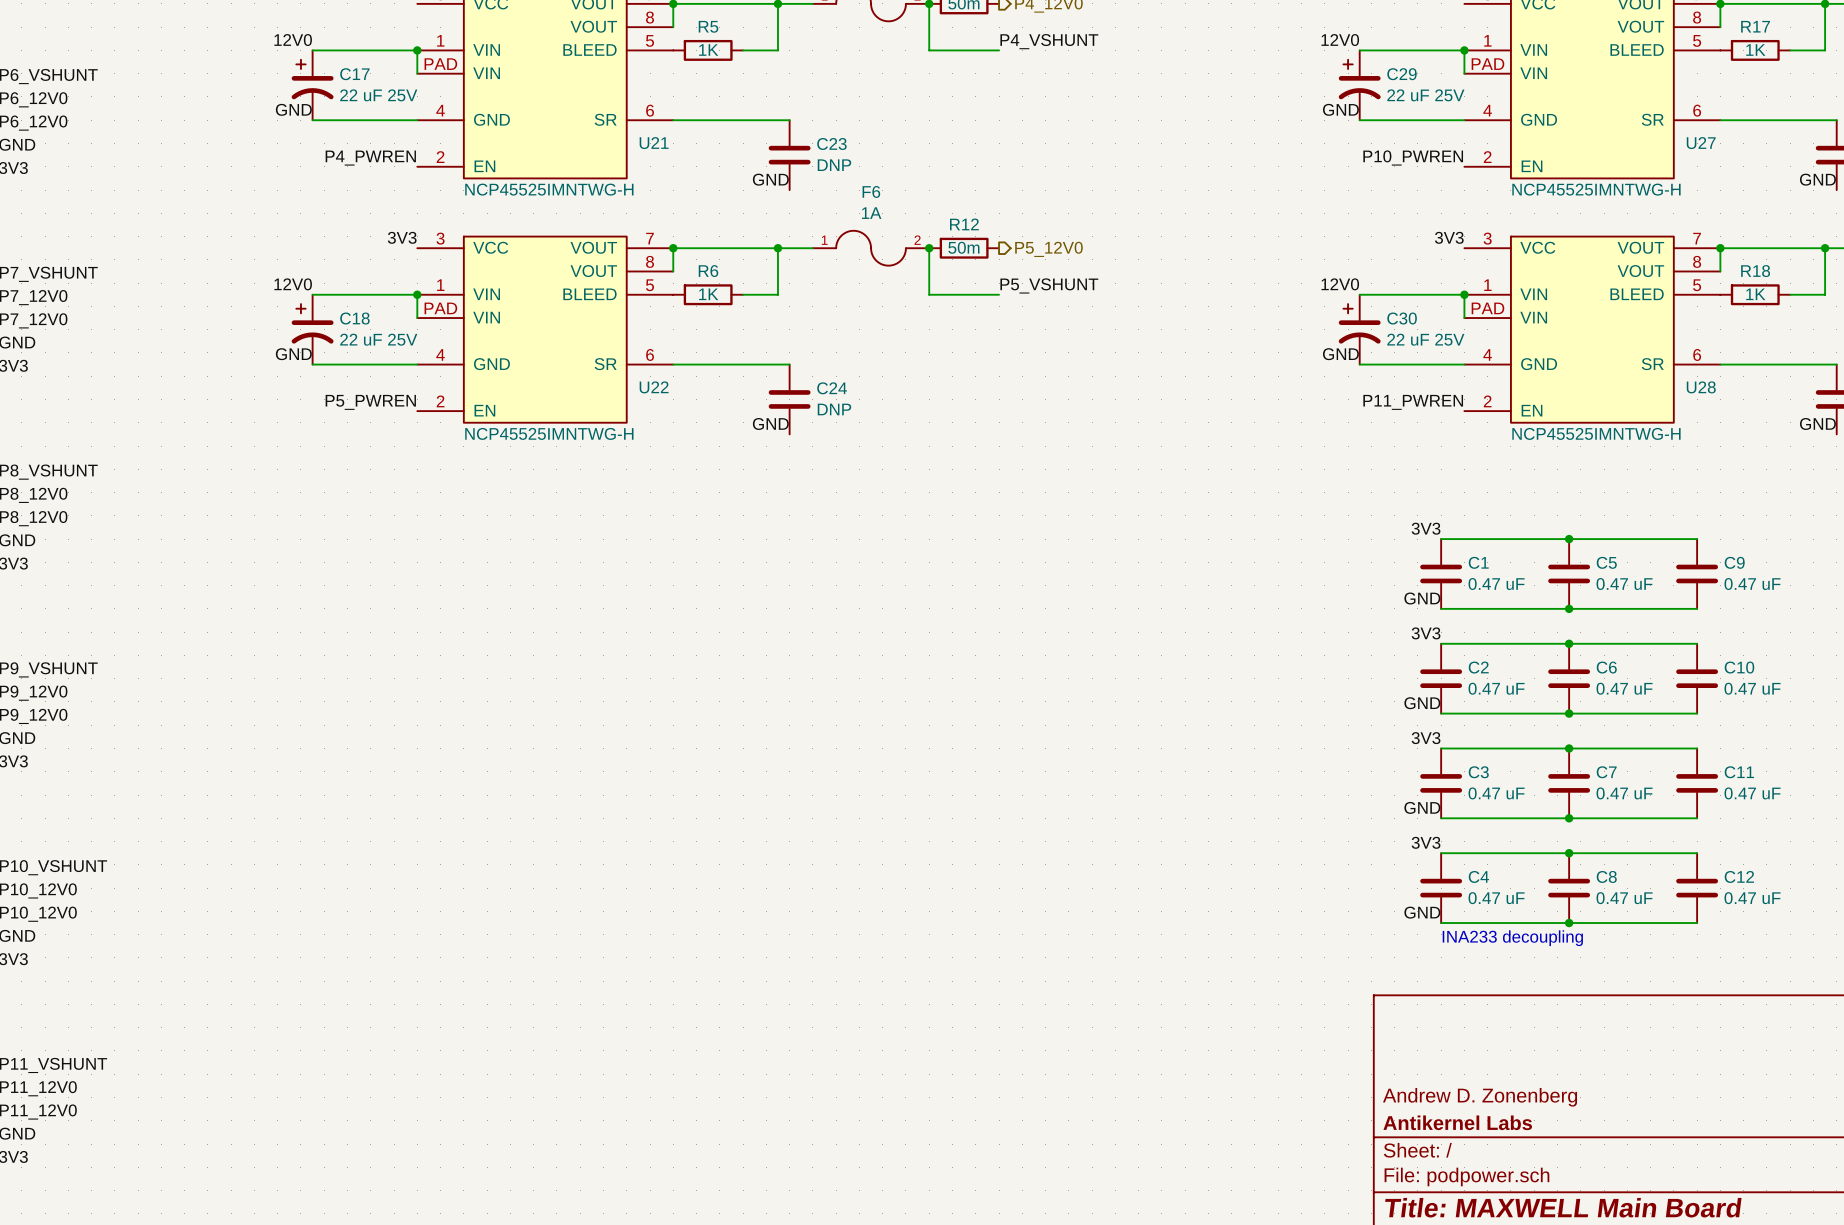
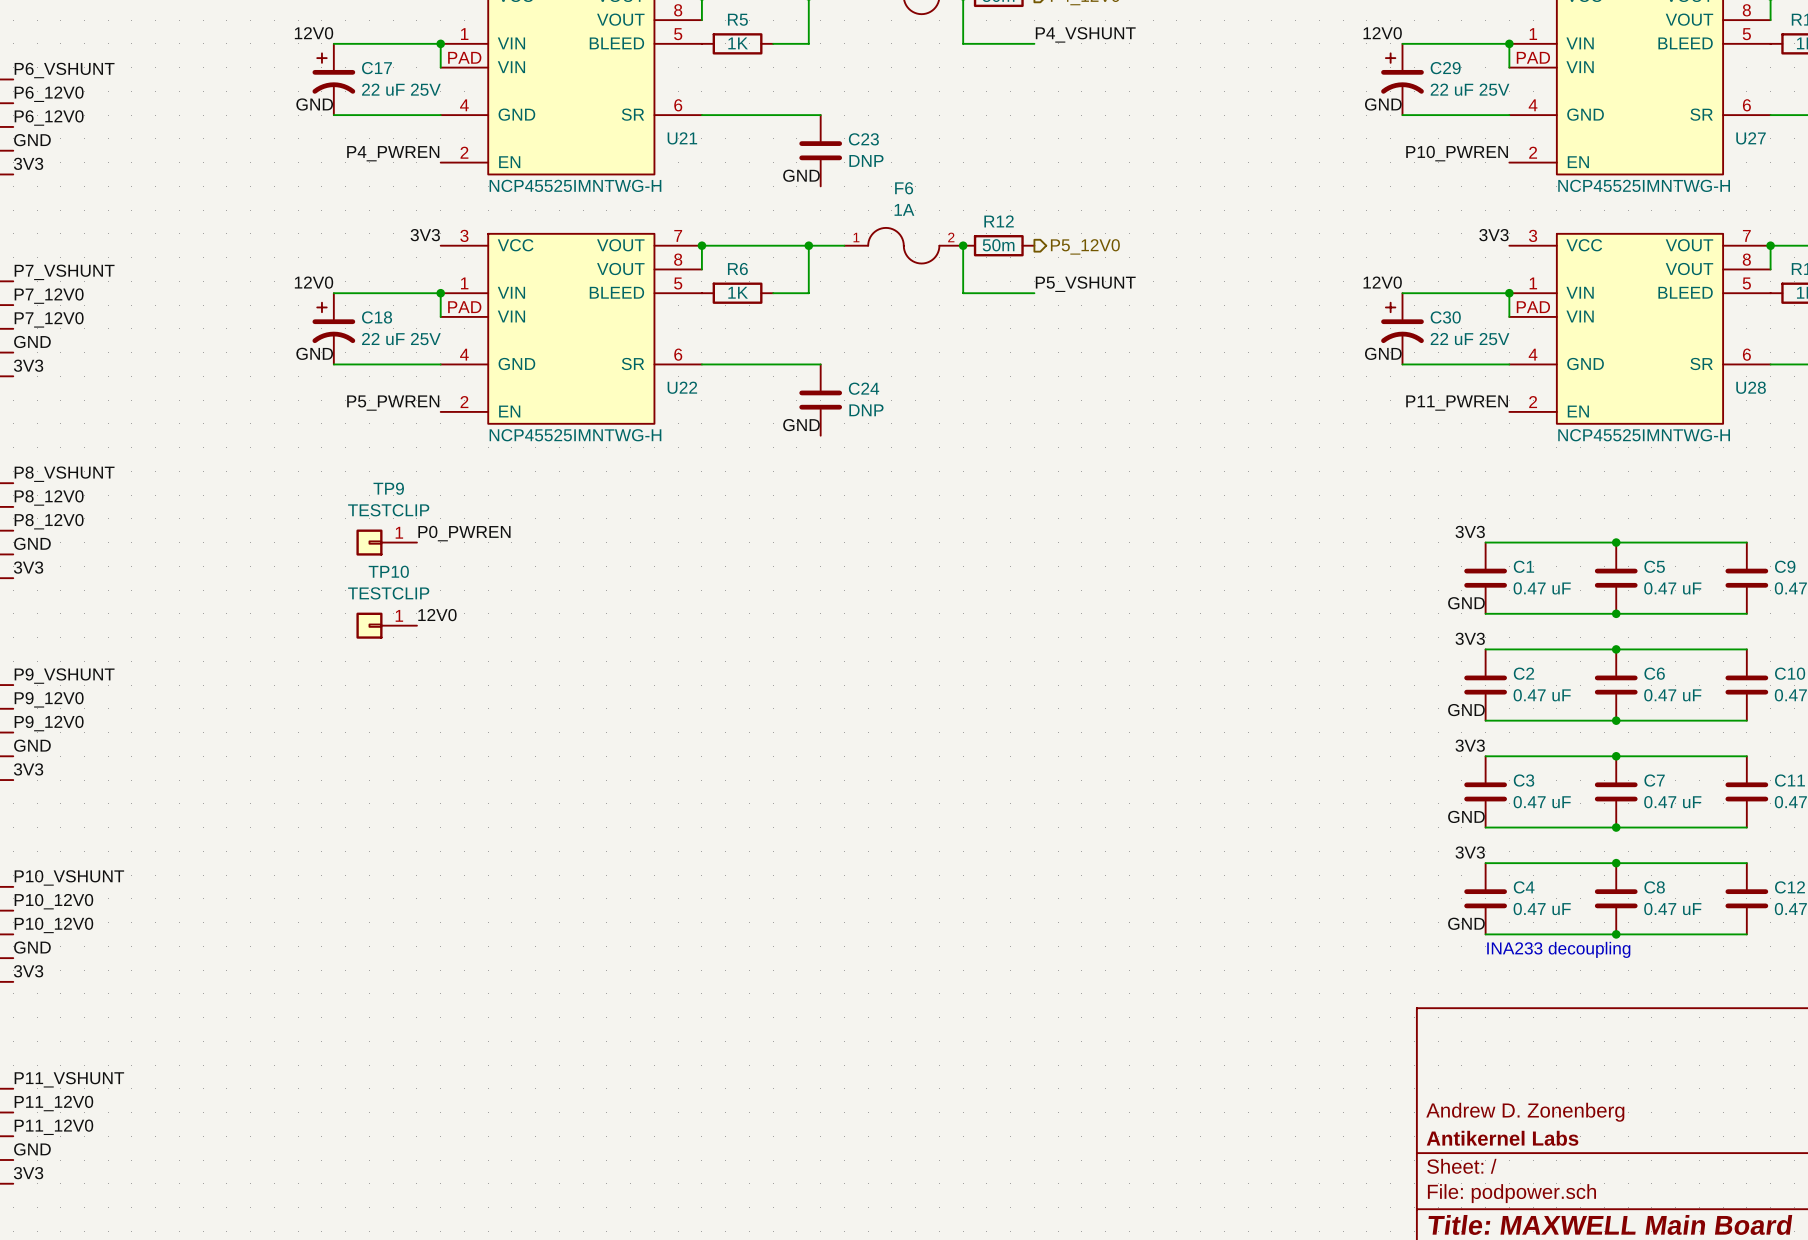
label: none -> P0_PWREN (464, 533)
TP9: none -> TESTCLIP (386, 542)
label: none -> 12V0 (437, 615)
TP10: none -> TESTCLIP (386, 625)

